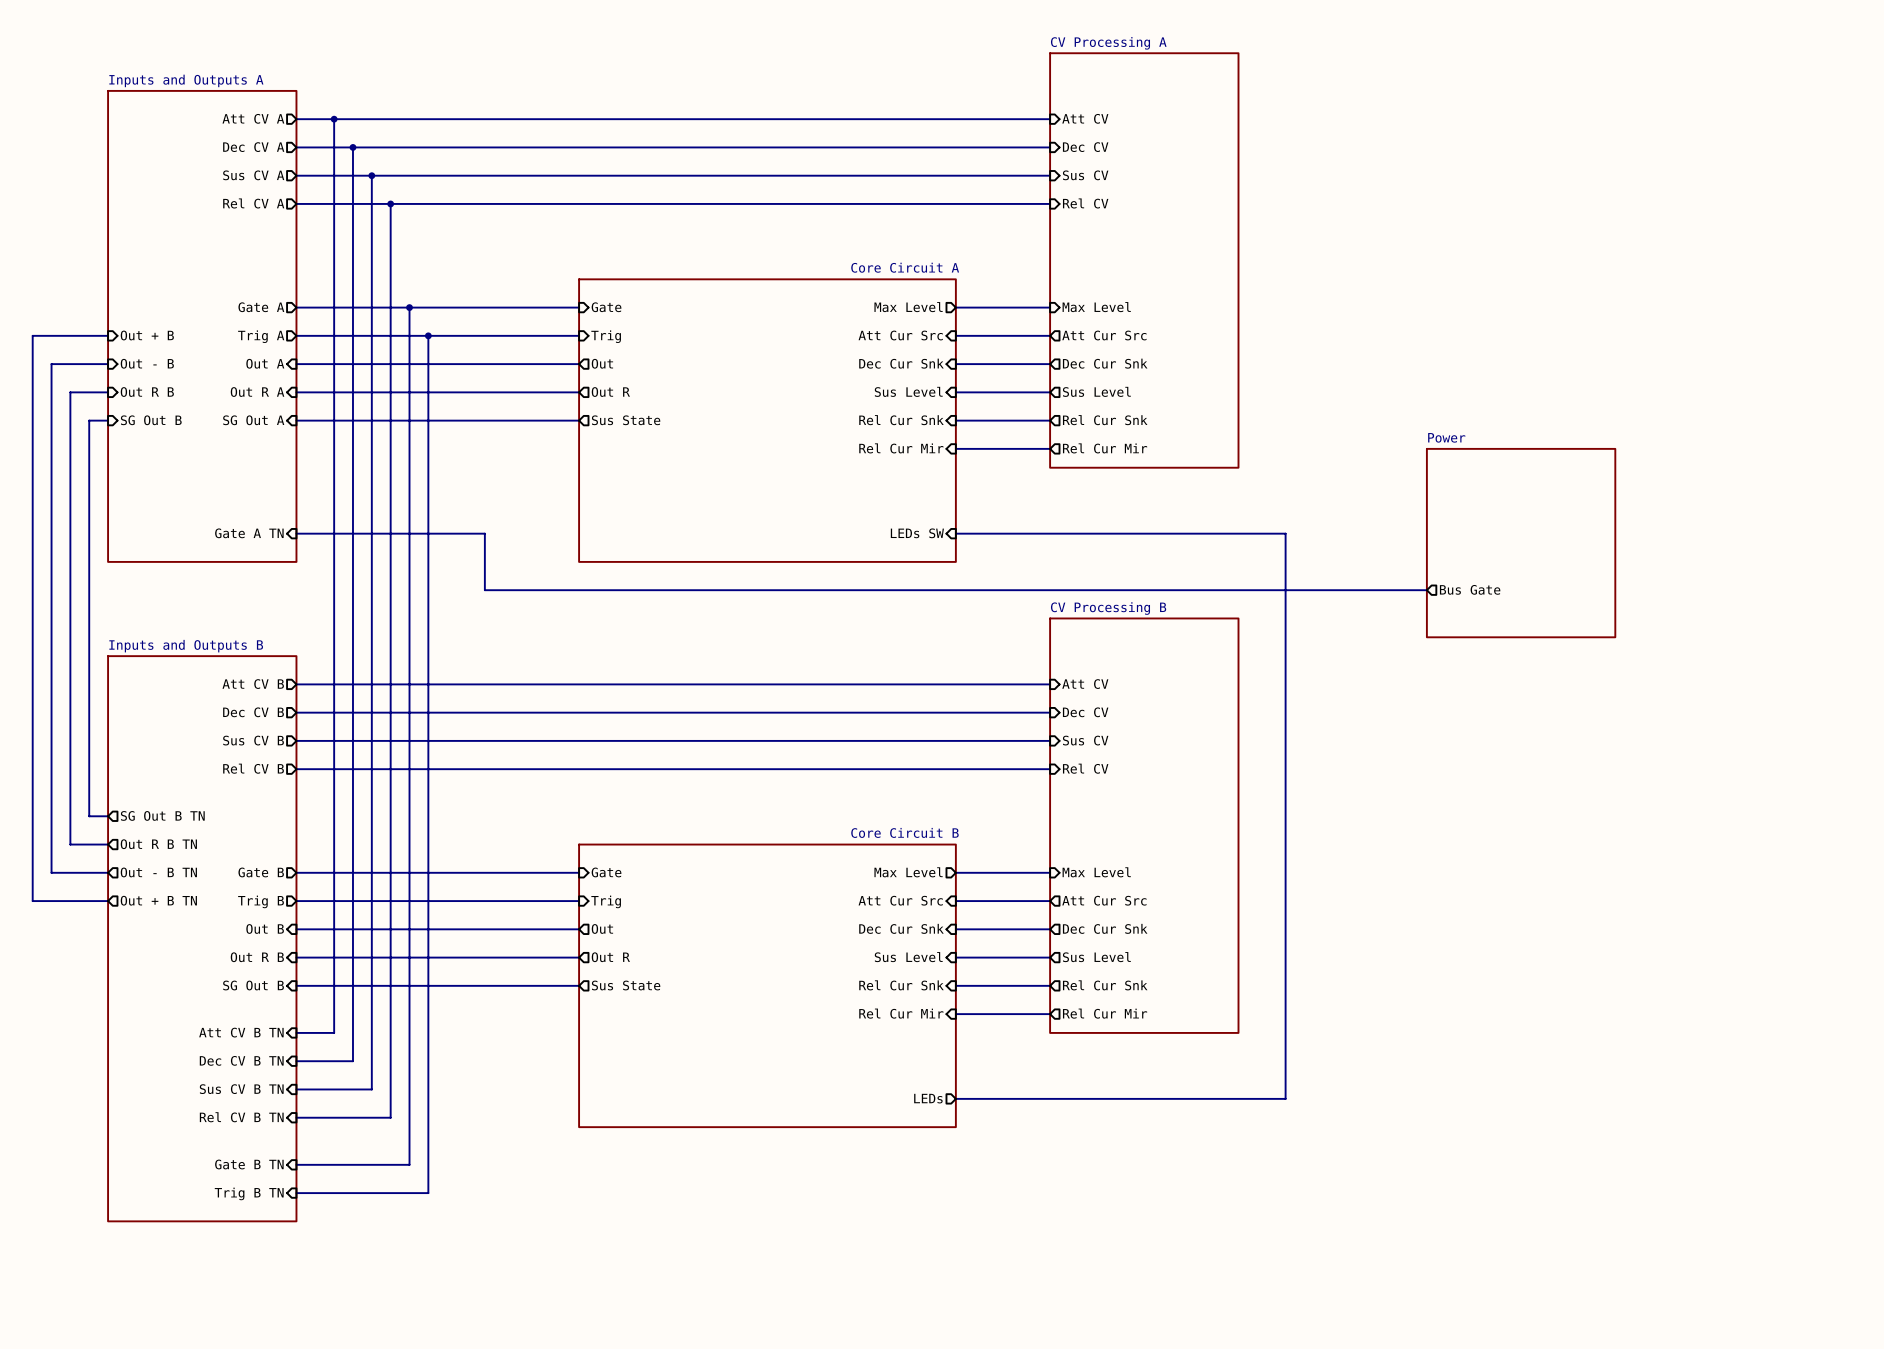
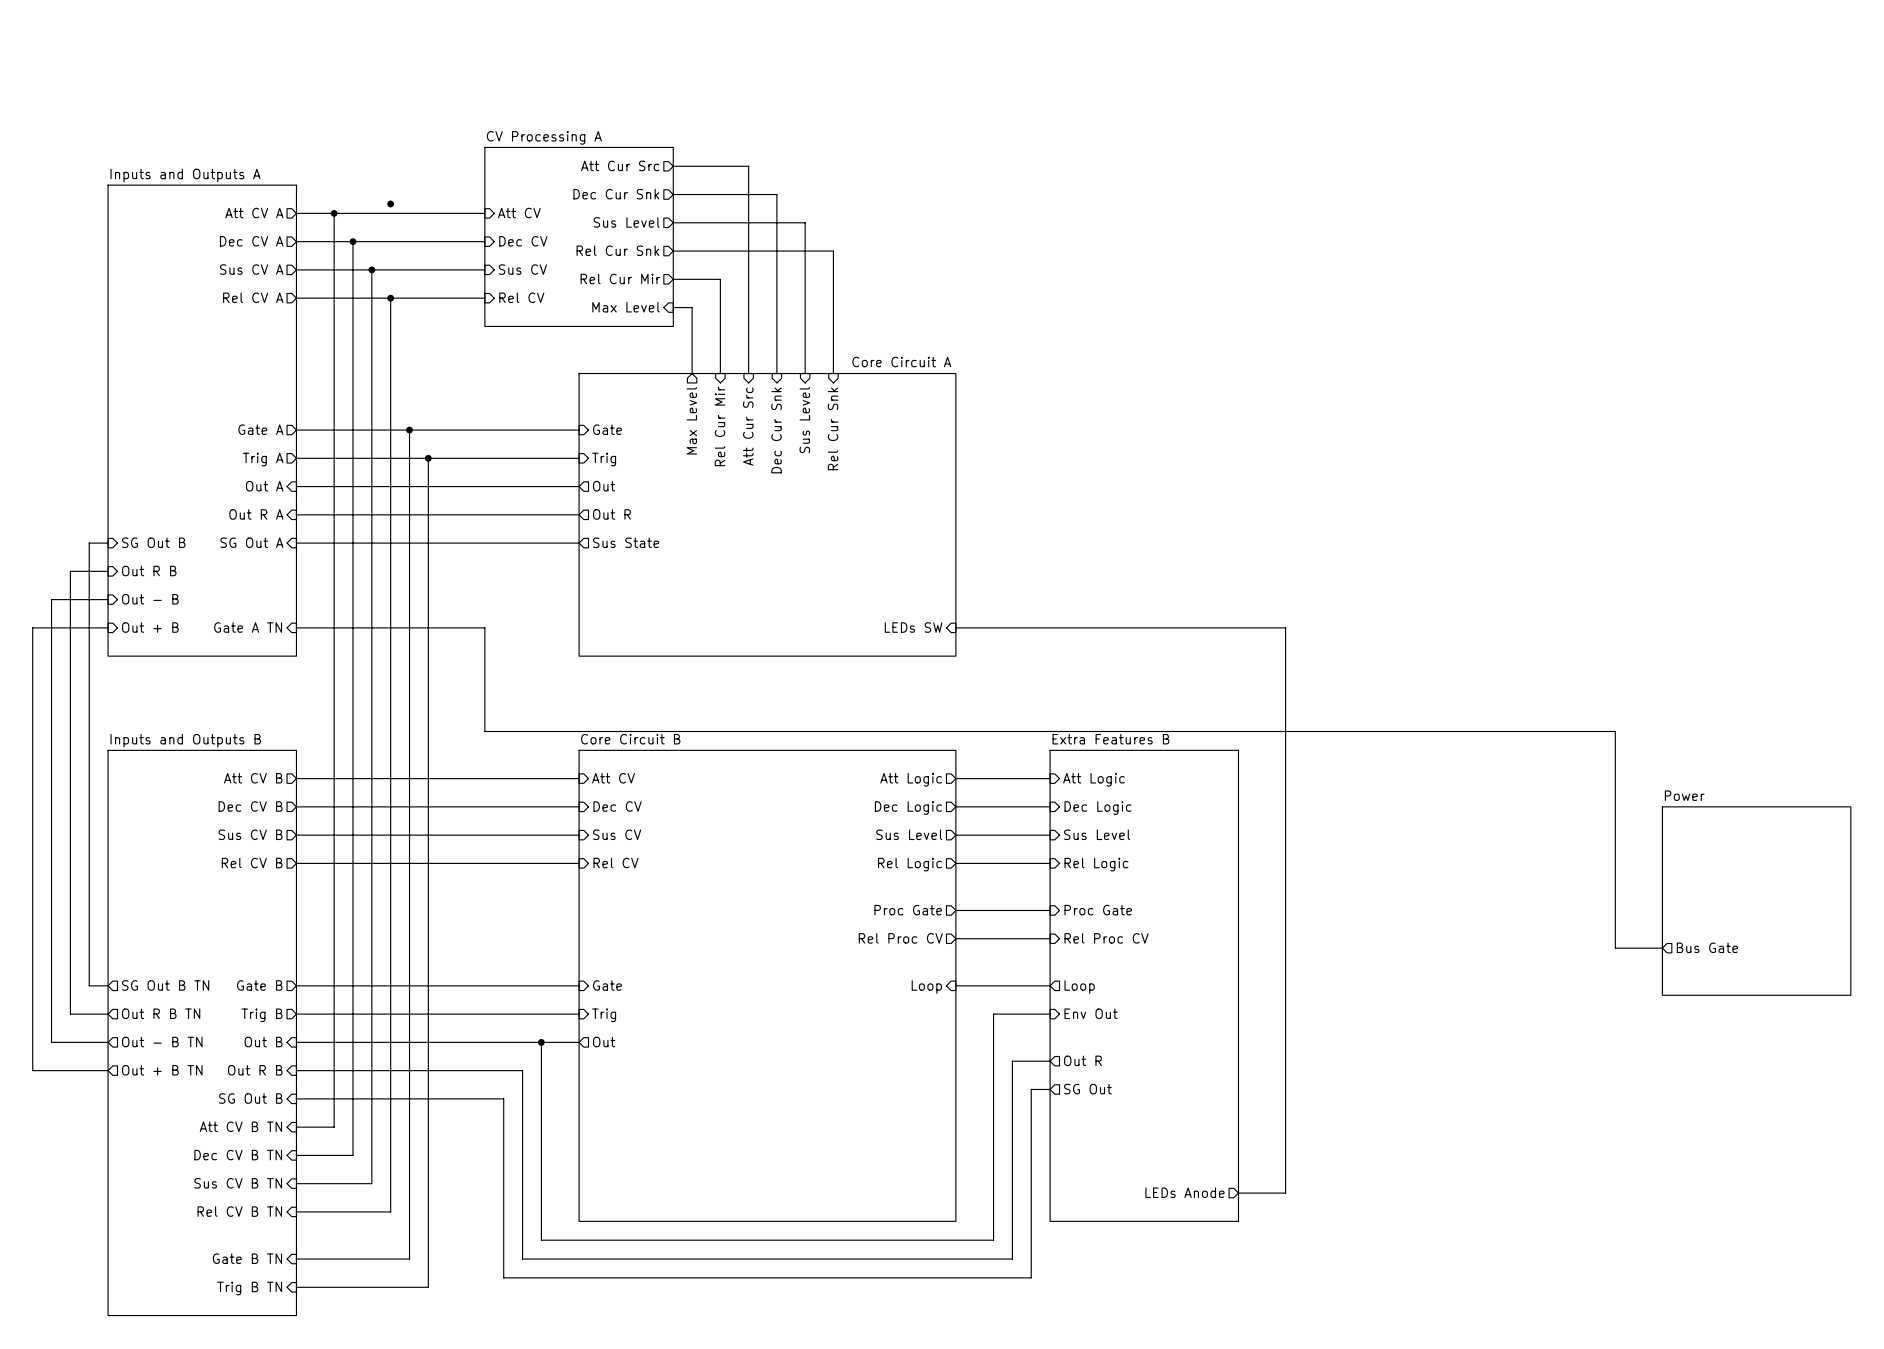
sheet pin position: Att CV A (253, 118) -> Att CV A (254, 213)
sheet pin: Att CV (1085, 118) -> none
wire: (296, 119) (1050, 119) -> none
wire: (334, 119) (334, 213) -> none
junction: (334, 119) -> none
sheet pin position: Dec CV A (253, 147) -> Dec CV A (251, 241)
wire: (296, 147) (1050, 147) -> none
wire: (352, 147) (352, 241) -> none
junction: (352, 147) -> none
sheet pin: Dec CV (1085, 147) -> none
sheet pin: none -> Att Cur Src (620, 165)
wire: none -> (673, 166) (748, 166) (748, 373)
sheet pin position: Sus CV A (253, 175) -> Sus CV A (251, 269)
wire: (296, 175) (1050, 175) -> none
wire: (371, 175) (371, 269) -> none
junction: (371, 175) -> none
sheet pin: Sus CV (1085, 175) -> none
sheet pin: none -> Dec Cur Snk (616, 194)
wire: none -> (673, 194) (776, 194) (776, 373)
sheet pin position: Rel CV A (253, 203) -> Rel CV A (253, 297)
wire: (296, 203) (1050, 203) -> none
wire: (390, 203) (390, 298) -> none
sheet pin: Rel CV (1085, 203) -> none
wire: none -> (296, 213) (484, 213)
junction: none -> (334, 213)
sheet pin: none -> Att CV (519, 213)
sheet pin: none -> Sus Level (626, 222)
wire: none -> (673, 222) (805, 222) (805, 373)
sheet CV Processing A: none -> (579, 236)
wire: none -> (296, 241) (484, 241)
junction: none -> (352, 241)
sheet pin: none -> Dec CV (523, 241)
sheet pin: none -> Rel Cur Snk (617, 250)
wire: none -> (673, 251) (833, 251) (833, 373)
sheet CV Processing A: (1144, 260) -> none
wire: none -> (296, 269) (484, 269)
junction: none -> (371, 269)
sheet pin: none -> Sus CV (522, 269)
sheet pin: none -> Rel Cur Mir (620, 278)
wire: none -> (673, 279) (720, 279) (720, 373)
sheet pin: none -> Rel CV (521, 297)
wire: none -> (296, 298) (484, 298)
sheet pin position: Gate A (261, 307) -> Gate A (260, 429)
wire: (296, 307) (579, 307) -> (296, 430) (579, 430)
wire: (409, 307) (409, 430) -> none
junction position: (409, 307) -> (390, 298)
sheet pin position: Gate (606, 307) -> Gate (607, 429)
sheet pin: none -> Max Level (626, 307)
wire: none -> (673, 307) (692, 307) (692, 373)
sheet pin: Max Level (908, 307) -> none
wire: (955, 307) (1050, 307) -> none
sheet pin: Max Level (1096, 307) -> none
sheet Inputs and Outputs A position: (202, 326) -> (202, 420)
wire: (108, 335) (32, 335) (32, 627) -> (108, 627) (32, 627)
sheet pin: Out + B (147, 335) -> none
wire: (296, 335) (579, 335) -> (296, 458) (579, 458)
wire: (428, 335) (428, 458) -> none
junction: (428, 335) -> none
sheet pin: Att Cur Src (900, 335) -> none
wire: (955, 335) (1050, 335) -> none
sheet pin: Att Cur Src (1104, 335) -> none
sheet pin position: Trig A (261, 336) -> Trig A (263, 459)
sheet pin position: Trig (606, 336) -> Trig (604, 459)
sheet pin: Out - B (147, 363) -> none
sheet pin position: Out A (265, 363) -> Out A (264, 486)
sheet pin position: Out (602, 363) -> Out (604, 486)
sheet pin: Dec Cur Snk (901, 363) -> none
sheet pin: Dec Cur Snk (1105, 363) -> none
wire: (108, 364) (51, 364) (51, 599) -> (108, 599) (51, 599)
wire: (296, 364) (579, 364) -> (296, 486) (579, 486)
wire: (955, 364) (1050, 364) -> none
sheet pin: Sus Level (908, 391) -> none
sheet pin: Sus Level (1096, 391) -> none
wire: (108, 392) (70, 392) (70, 571) -> (108, 571) (70, 571)
sheet pin position: Out R B (147, 392) -> Out R B (149, 571)
sheet pin position: Out R A (257, 392) -> Out R A (256, 514)
wire: (296, 392) (579, 392) -> (296, 514) (579, 514)
sheet pin position: Out R (610, 392) -> Out R (611, 514)
wire: (955, 392) (1050, 392) -> none
wire: (108, 420) (89, 420) (89, 543) -> (108, 543) (89, 543)
sheet pin position: SG Out B (151, 420) -> SG Out B (153, 542)
sheet pin position: SG Out A (253, 420) -> SG Out A (251, 542)
wire: (296, 420) (579, 420) -> (296, 543) (579, 543)
sheet pin position: Sus State (626, 420) -> Sus State (626, 542)
sheet pin: none -> Max Level (691, 420)
sheet Core Circuit A position: (767, 420) -> (767, 514)
sheet pin: none -> Sus Level (804, 420)
sheet pin: Rel Cur Snk (901, 420) -> none
wire: (955, 420) (1050, 420) -> none
sheet pin: Rel Cur Snk (1105, 420) -> none
sheet pin: none -> Dec Cur Snk (776, 430)
sheet pin: none -> Rel Cur Snk (833, 428)
sheet pin: none -> Rel Cur Mir (720, 426)
sheet pin: none -> Att Cur Src (748, 426)
junction: none -> (409, 430)
sheet pin: Rel Cur Mir (901, 448) -> none
wire: (955, 448) (1050, 448) -> none
sheet pin: Rel Cur Mir (1105, 448) -> none
junction: none -> (428, 458)
sheet pin position: Gate A TN (249, 533) -> Gate A TN (248, 627)
wire: (296, 533) (484, 533) (484, 590) (1426, 590) -> none
sheet pin position: LEDs SW (917, 533) -> LEDs SW (913, 627)
wire: (955, 533) (1285, 533) (1285, 627) -> (955, 627) (1285, 627)
sheet Power: (1521, 543) -> none
sheet pin: Bus Gate (1470, 589) -> none
sheet pin: none -> Out - B (150, 599)
sheet pin: none -> Out + B (150, 627)
wire: none -> (296, 627) (484, 627) (484, 731) (1615, 731) (1615, 948) (1662, 948)
sheet pin position: Att CV B (253, 684) -> Att CV B (253, 778)
wire: (296, 684) (1050, 684) -> none
sheet pin: Att CV (1085, 684) -> none
sheet pin position: Dec CV B (253, 712) -> Dec CV B (250, 806)
wire: (296, 712) (1050, 712) -> none
sheet pin: Dec CV (1085, 712) -> none
sheet pin position: Sus CV B (253, 740) -> Sus CV B (250, 834)
wire: (296, 740) (1050, 740) -> none
sheet pin: Sus CV (1085, 740) -> none
sheet pin position: Rel CV B (253, 768) -> Rel CV B (252, 863)
sheet pin: Rel CV (1085, 768) -> none
wire: (296, 769) (1050, 769) -> none
sheet pin: none -> Att CV (613, 778)
sheet pin: none -> Att Logic (911, 779)
sheet pin: none -> Att Logic (1093, 779)
sheet pin: none -> Dec CV (617, 806)
sheet pin: none -> Dec Logic (908, 808)
sheet pin: none -> Dec Logic (1098, 808)
sheet pin position: SG Out B TN (162, 815) -> SG Out B TN (165, 985)
wire: (89, 816) (108, 816) -> (89, 816) (89, 985) (108, 985)
sheet CV Processing B: (1144, 825) -> none
sheet Core Circuit B name position: Core Circuit B (904, 832) -> Core Circuit B (630, 739)
sheet pin: none -> Sus CV (617, 834)
sheet pin: none -> Sus Level (909, 834)
sheet pin: none -> Sus Level (1097, 834)
sheet Core Circuit B shape: [578, 843, 957, 1128] -> [578, 749, 957, 1222]
wire: (70, 844) (108, 844) -> (70, 844) (70, 1014) (108, 1014)
sheet pin position: Out R B TN (158, 844) -> Out R B TN (161, 1013)
sheet pin: none -> Rel CV (616, 863)
sheet pin: none -> Rel Logic (909, 864)
sheet pin: none -> Rel Logic (1096, 864)
wire: (51, 872) (108, 872) -> (51, 872) (51, 1042) (108, 1042)
sheet pin position: Out - B TN (158, 872) -> Out - B TN (162, 1042)
sheet pin: Gate B (261, 872) -> none
wire: (296, 872) (579, 872) -> (296, 778) (579, 778)
sheet pin: Gate (606, 872) -> none
sheet pin: Max Level (908, 872) -> none
wire: (955, 872) (1050, 872) -> (955, 778) (1050, 778)
sheet pin: Max Level (1096, 872) -> none
sheet pin position: Out + B TN (158, 900) -> Out + B TN (162, 1070)
sheet pin: Att Cur Src (900, 900) -> none
sheet pin: Att Cur Src (1104, 900) -> none
wire: (32, 901) (108, 901) -> (32, 901) (32, 1070) (108, 1070)
sheet pin position: Trig B (261, 901) -> Trig B (262, 1015)
wire: (296, 901) (579, 901) -> (296, 806) (579, 806)
sheet pin position: Trig (606, 901) -> Trig (604, 1015)
wire: (955, 901) (1050, 901) -> (955, 806) (1050, 806)
sheet Power: none -> (1756, 901)
sheet pin: none -> Proc Gate (908, 910)
wire: none -> (955, 910) (1050, 910)
sheet pin: none -> Proc Gate (1098, 910)
sheet pin position: Out B (265, 928) -> Out B (263, 1042)
sheet pin position: Out (602, 928) -> Out (604, 1042)
sheet pin: Dec Cur Snk (901, 928) -> none
sheet pin: Dec Cur Snk (1105, 928) -> none
wire: (296, 929) (579, 929) -> (296, 835) (579, 835)
wire: (955, 929) (1050, 929) -> (955, 835) (1050, 835)
sheet Inputs and Outputs B position: (202, 938) -> (202, 1032)
sheet pin: none -> Rel Proc CV (900, 938)
wire: none -> (955, 938) (1050, 938)
sheet pin: none -> Rel Proc CV (1106, 938)
sheet pin: none -> Bus Gate (1707, 947)
sheet pin position: Out R B (257, 957) -> Out R B (255, 1070)
wire: (296, 957) (579, 957) -> (296, 863) (579, 863)
sheet pin: Out R (610, 957) -> none
sheet pin: Sus Level (908, 957) -> none
wire: (955, 957) (1050, 957) -> (955, 863) (1050, 863)
sheet pin: Sus Level (1096, 957) -> none
sheet pin shape: input (253, 985) -> output (259, 985)
sheet pin: SG Out B (253, 985) -> Gate B (259, 985)
sheet pin shape: output (626, 985) -> input (607, 985)
sheet pin: Sus State (626, 985) -> Gate (607, 985)
sheet pin: Rel Cur Snk (901, 985) -> Loop (926, 987)
sheet pin: Rel Cur Snk (1105, 985) -> Loop (1079, 987)
sheet Extra Features B: none -> (1144, 985)
sheet pin: Rel Cur Mir (901, 1013) -> none
sheet pin shape: output (1105, 1013) -> input (1091, 1013)
sheet pin: Rel Cur Mir (1105, 1013) -> Env Out (1091, 1013)
wire: none -> (296, 1014) (579, 1014)
wire: (955, 1014) (993, 1014) -> (541, 1042) (541, 1240) (993, 1240) (993, 1014)
sheet pin position: Att CV B TN (241, 1032) -> Att CV B TN (240, 1126)
wire: (296, 1032) (334, 1032) -> (296, 1127) (334, 1127) (334, 1032)
wire: none -> (296, 1042) (579, 1042)
junction: none -> (541, 1042)
sheet pin position: Dec CV B TN (241, 1060) -> Dec CV B TN (238, 1155)
sheet pin: none -> Out R (1082, 1060)
wire: (296, 1061) (352, 1061) -> (296, 1155) (352, 1155) (352, 1061)
wire: none -> (1050, 1061) (1012, 1061) (1012, 1259) (522, 1259) (522, 1070) (296, 1070)
sheet pin position: Sus CV B TN (241, 1089) -> Sus CV B TN (238, 1183)
wire: (296, 1089) (371, 1089) -> (296, 1183) (371, 1183) (371, 1089)
wire: none -> (1050, 1089) (1031, 1089) (1031, 1277) (503, 1277) (503, 1098) (296, 1098)
sheet pin: none -> SG Out (1087, 1089)
sheet pin: none -> SG Out B (250, 1098)
sheet pin: LEDs (928, 1098) -> none
wire: (955, 1098) (1285, 1098) -> (1238, 1193) (1285, 1193) (1285, 1098)
sheet pin position: Rel CV B TN (241, 1117) -> Rel CV B TN (239, 1211)
wire: (296, 1117) (390, 1117) -> (296, 1211) (390, 1211) (390, 1117)
sheet pin position: Gate B TN (249, 1164) -> Gate B TN (247, 1258)
wire: (296, 1164) (409, 1164) -> (296, 1259) (409, 1259) (409, 1164)
sheet pin: none -> LEDs Anode (1184, 1192)
sheet pin position: Trig B TN (249, 1193) -> Trig B TN (249, 1288)
wire: (296, 1193) (428, 1193) -> (296, 1287) (428, 1287) (428, 1193)

